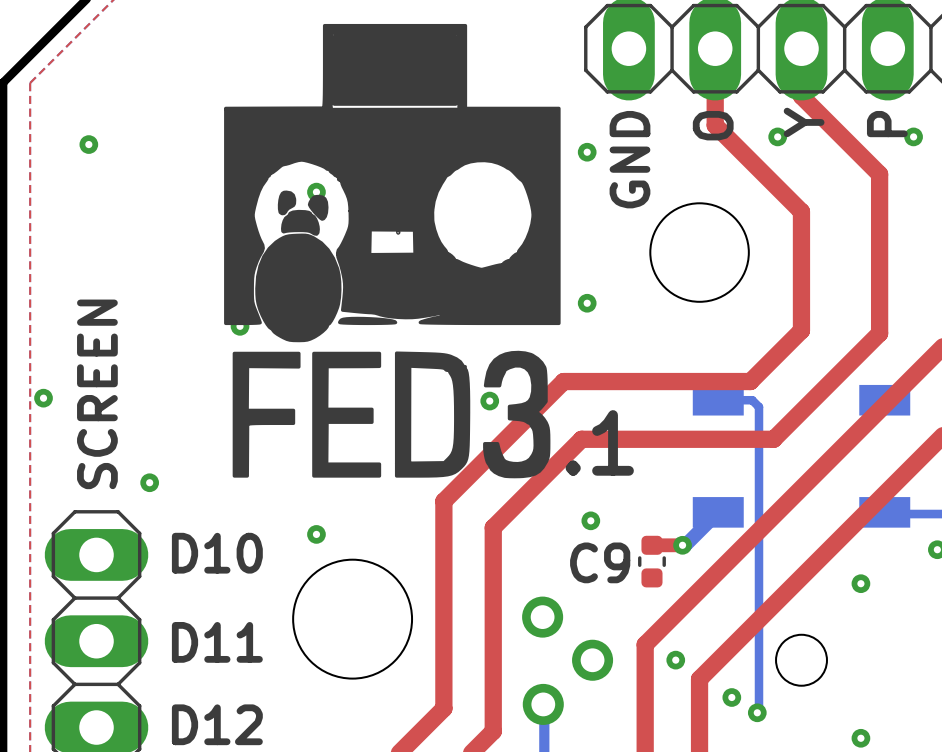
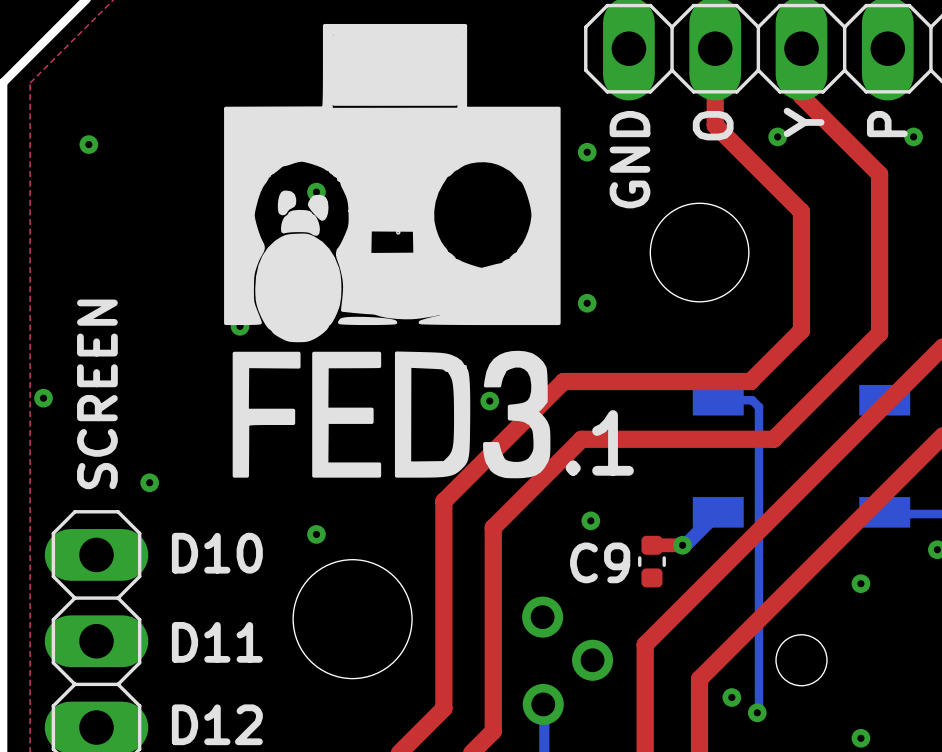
via: (675, 660) -> none

